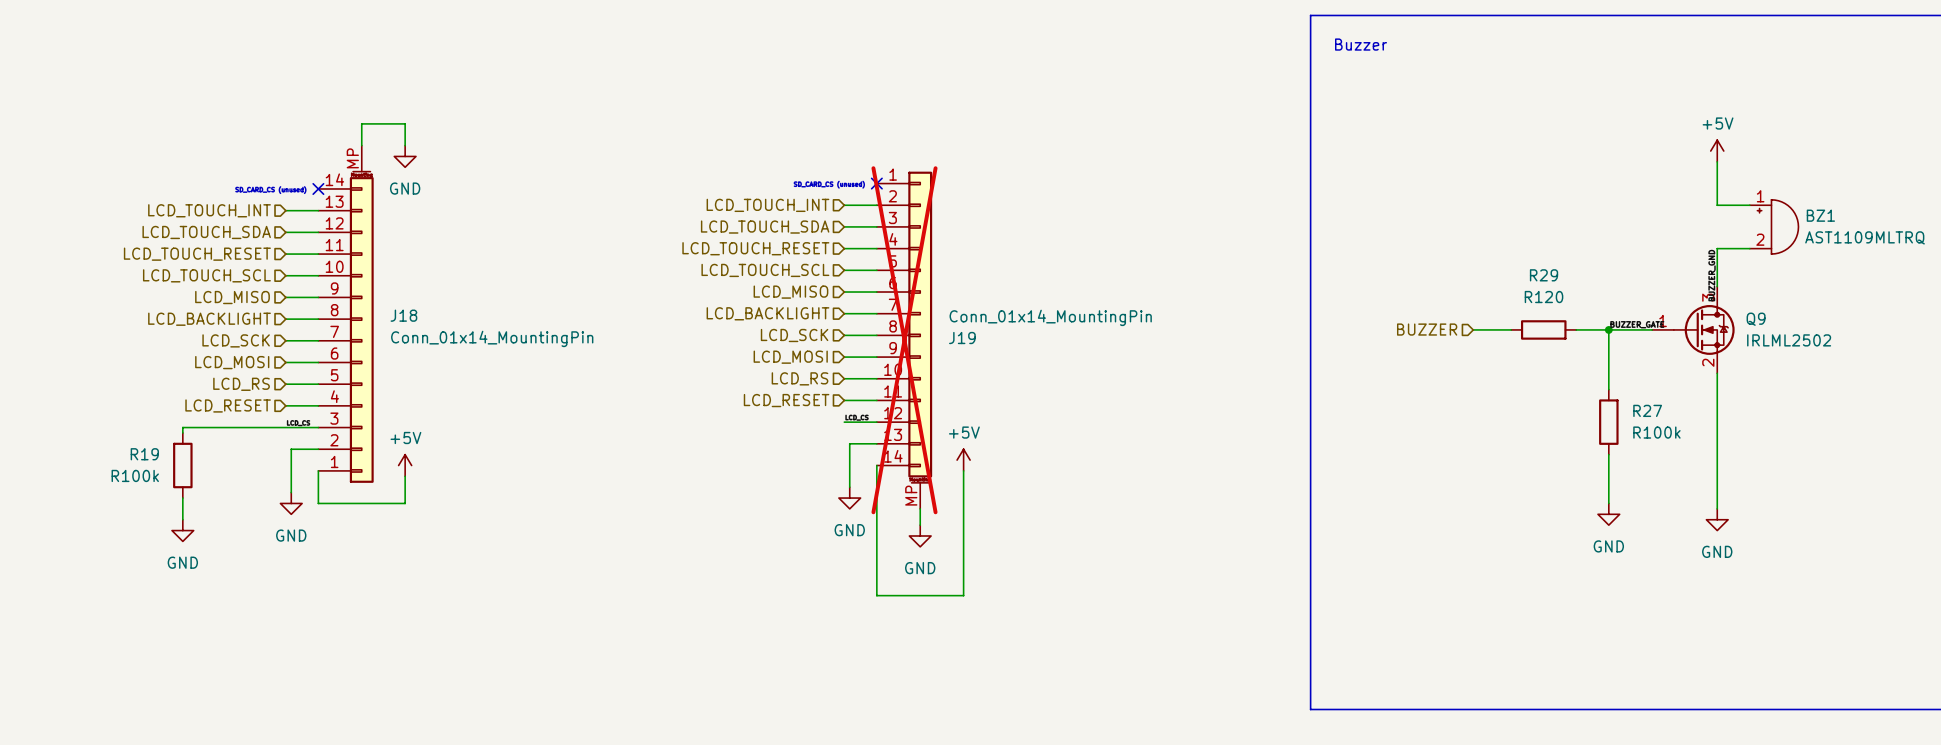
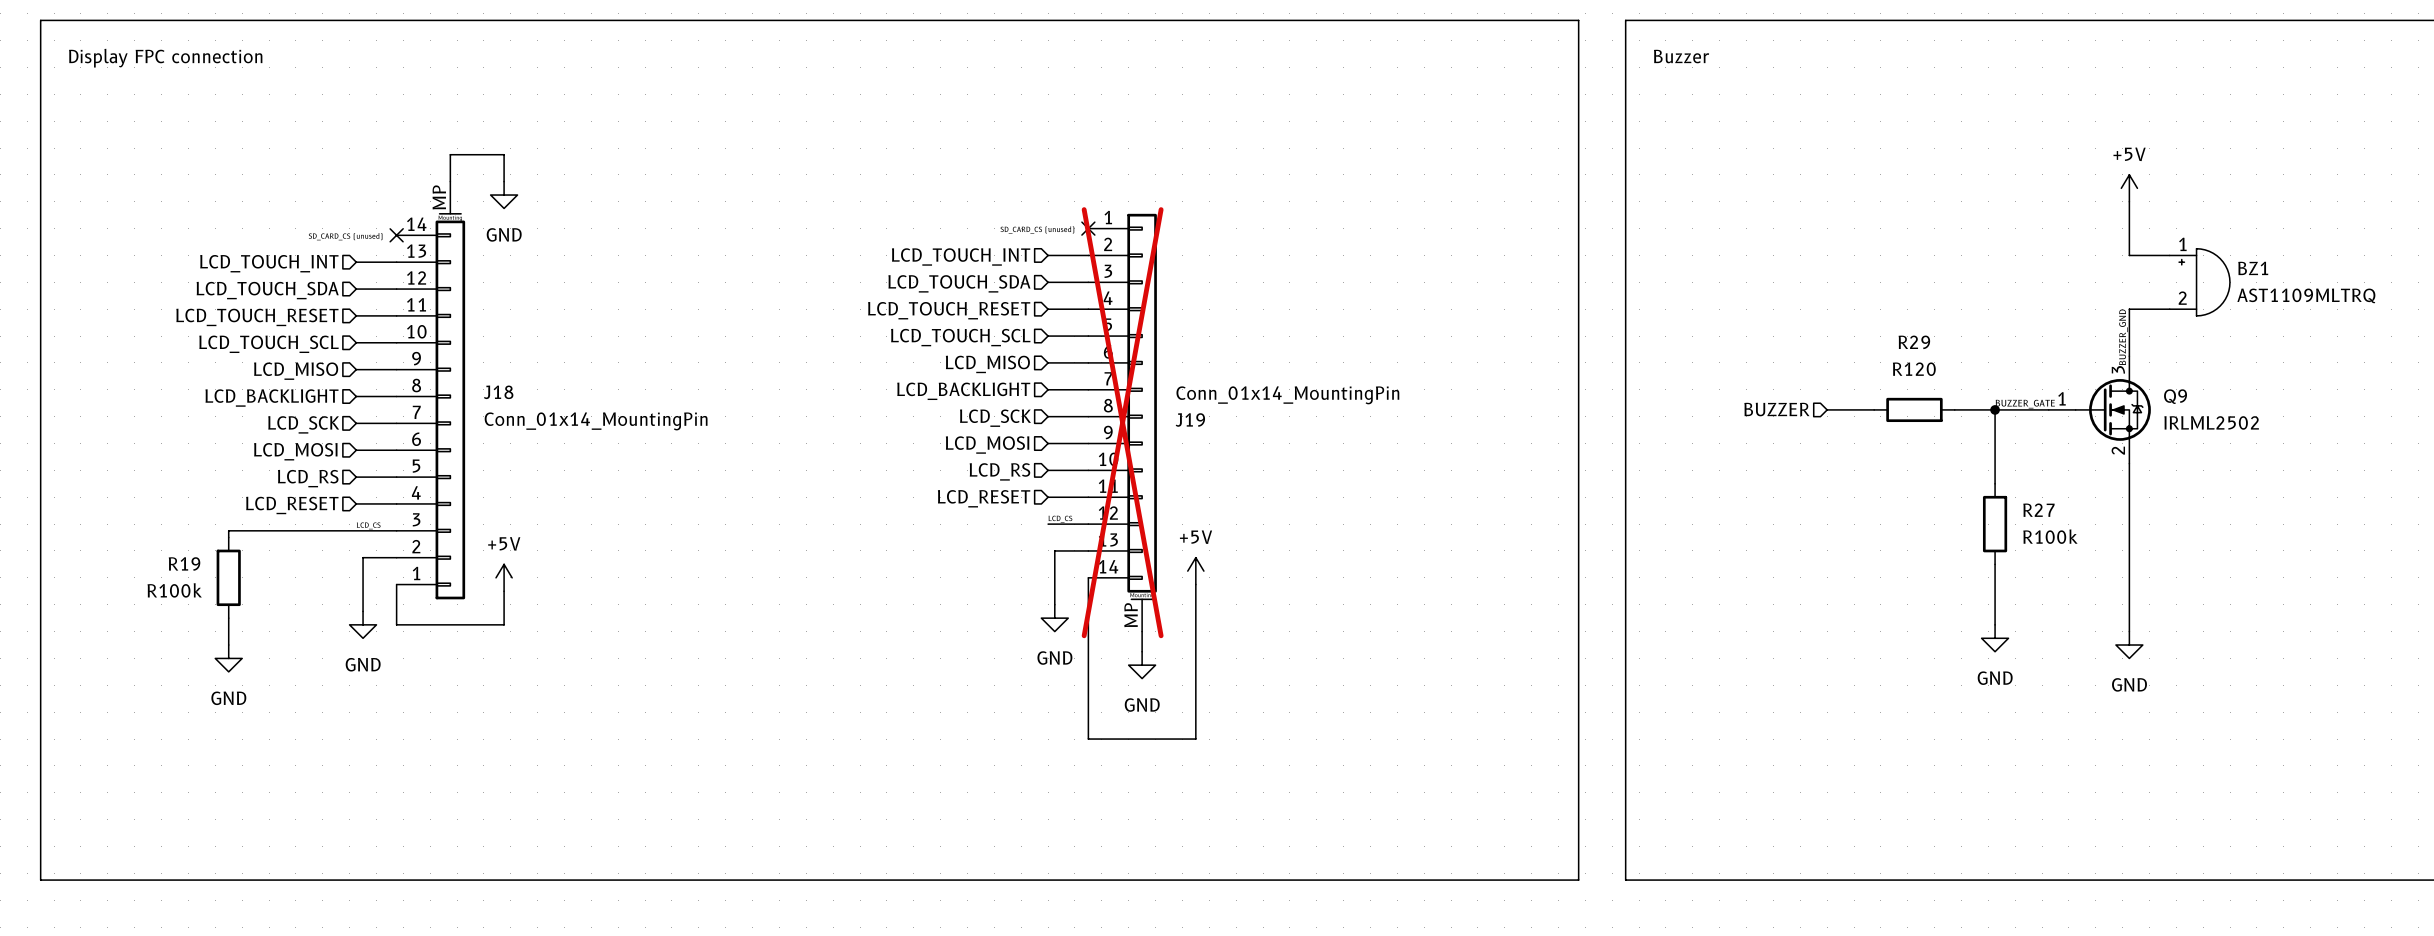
line: none -> (40, 20) (1578, 20) (1578, 880) (40, 880) (40, 20)
text: none -> Display FPC connection (165, 58)

